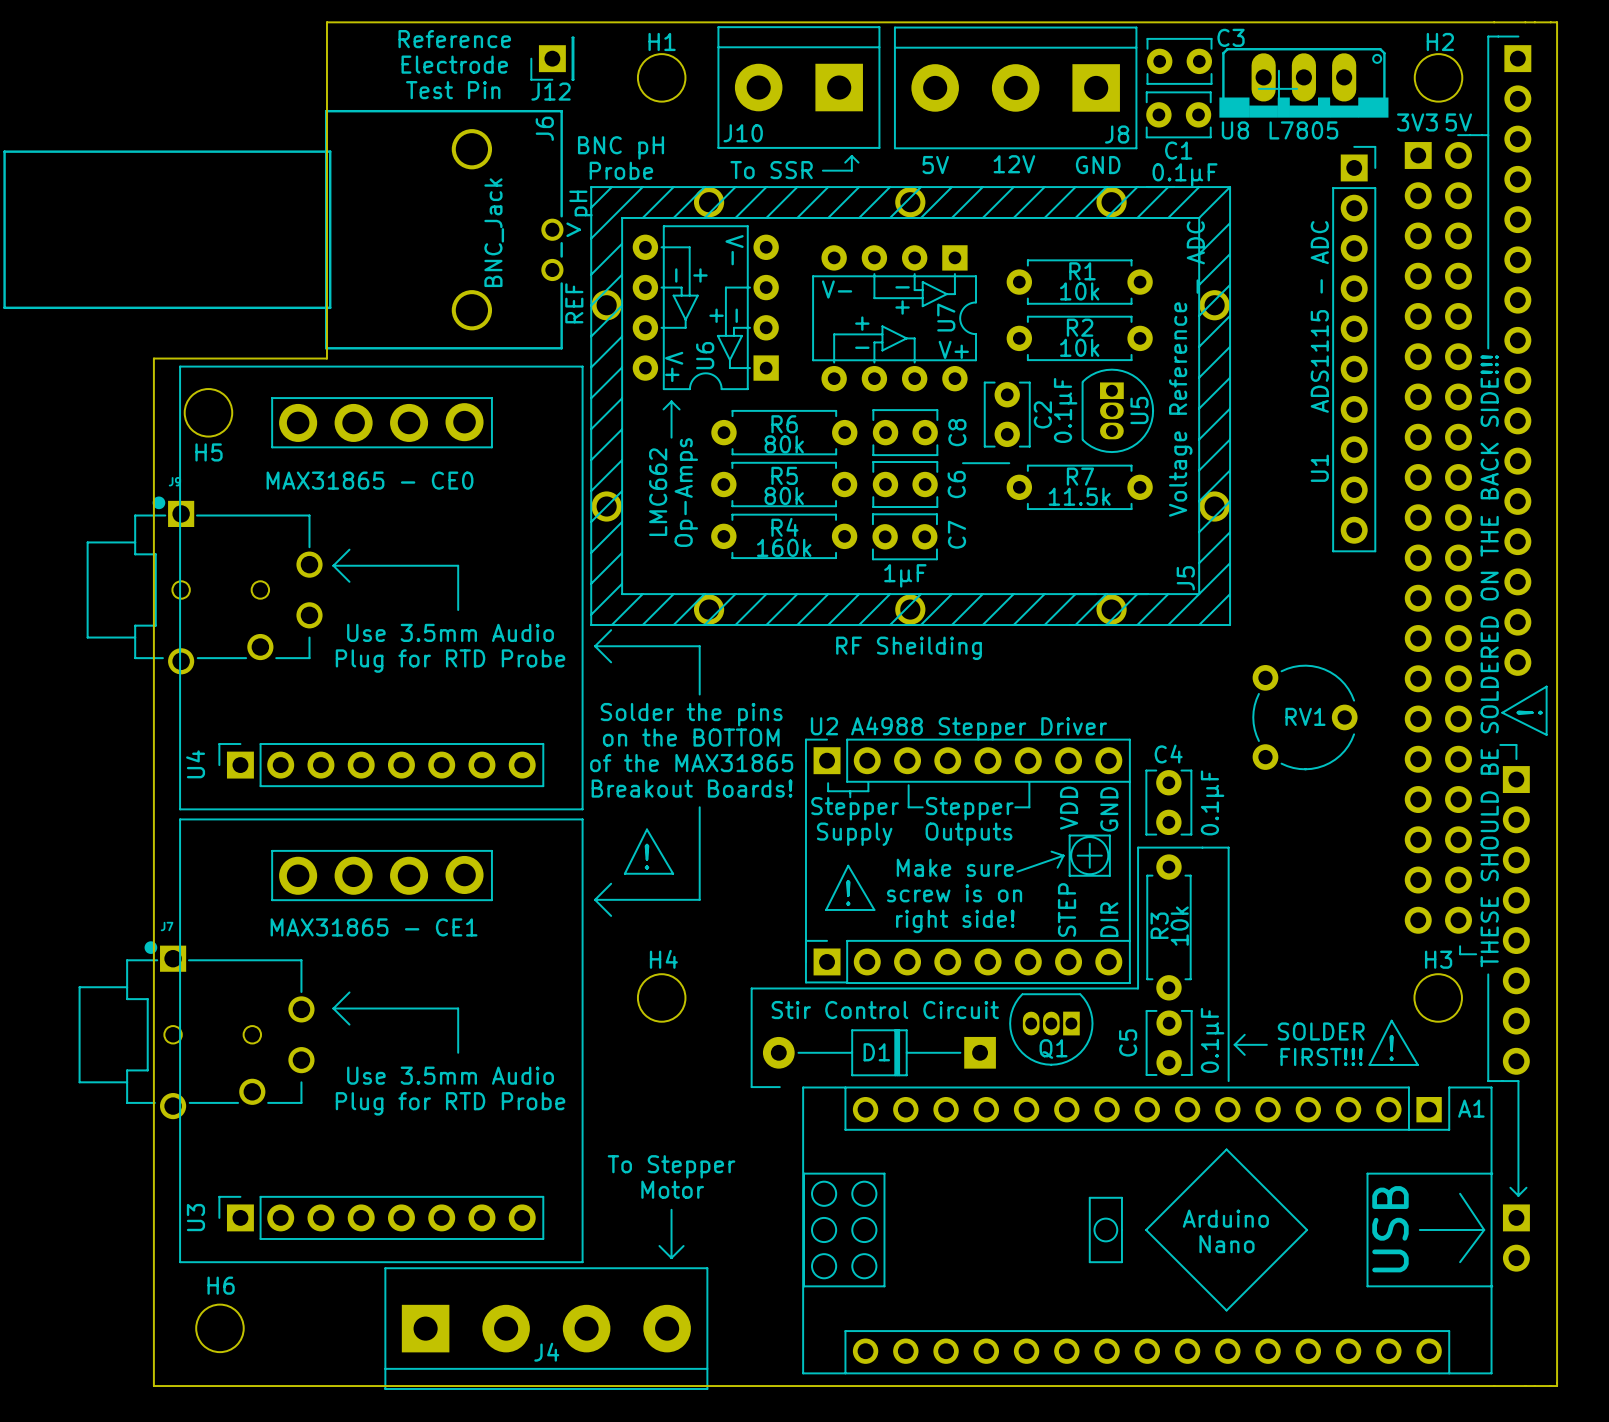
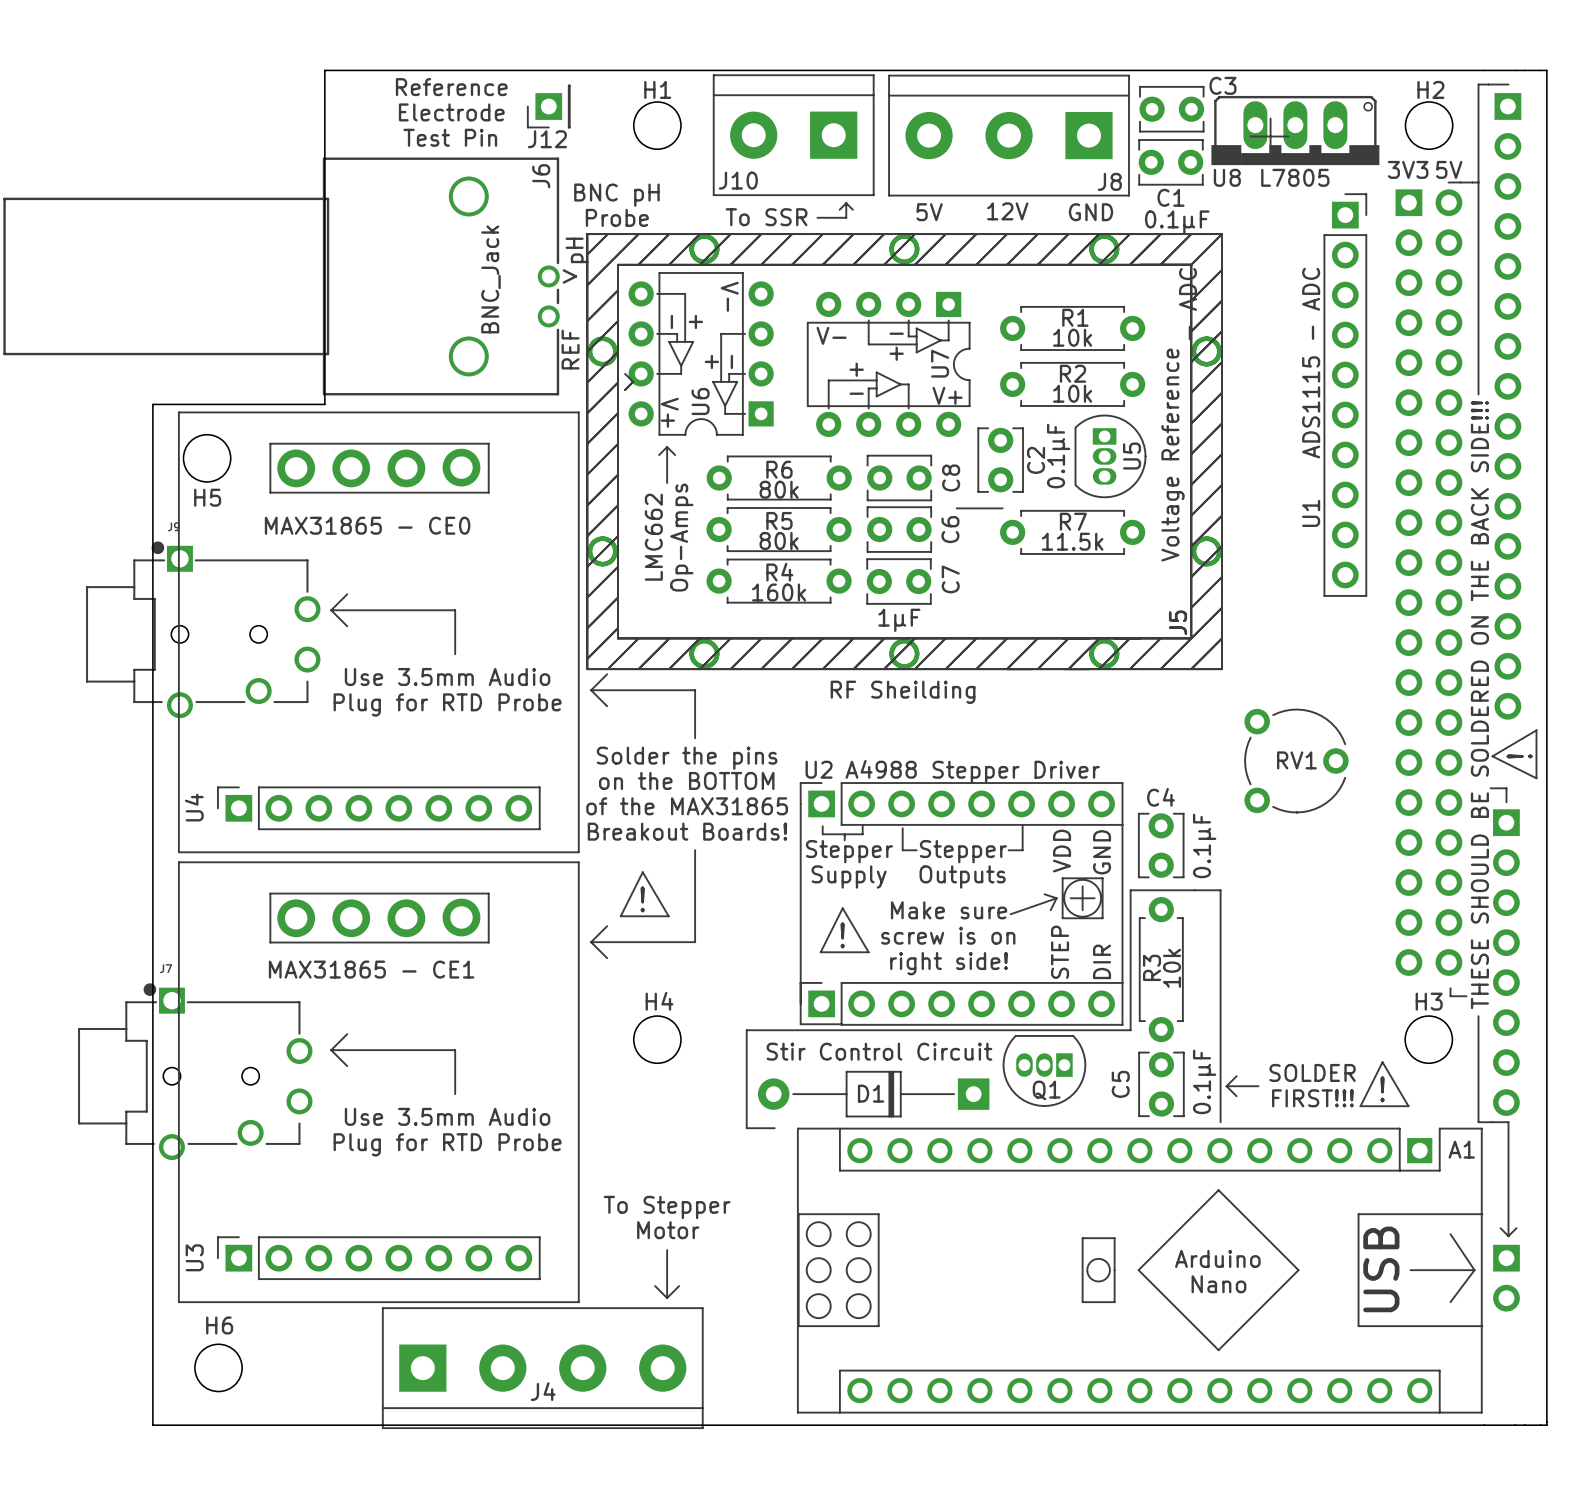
line: none -> (625, 373) (633, 381) (625, 389)
J5: none -> (904, 451)

